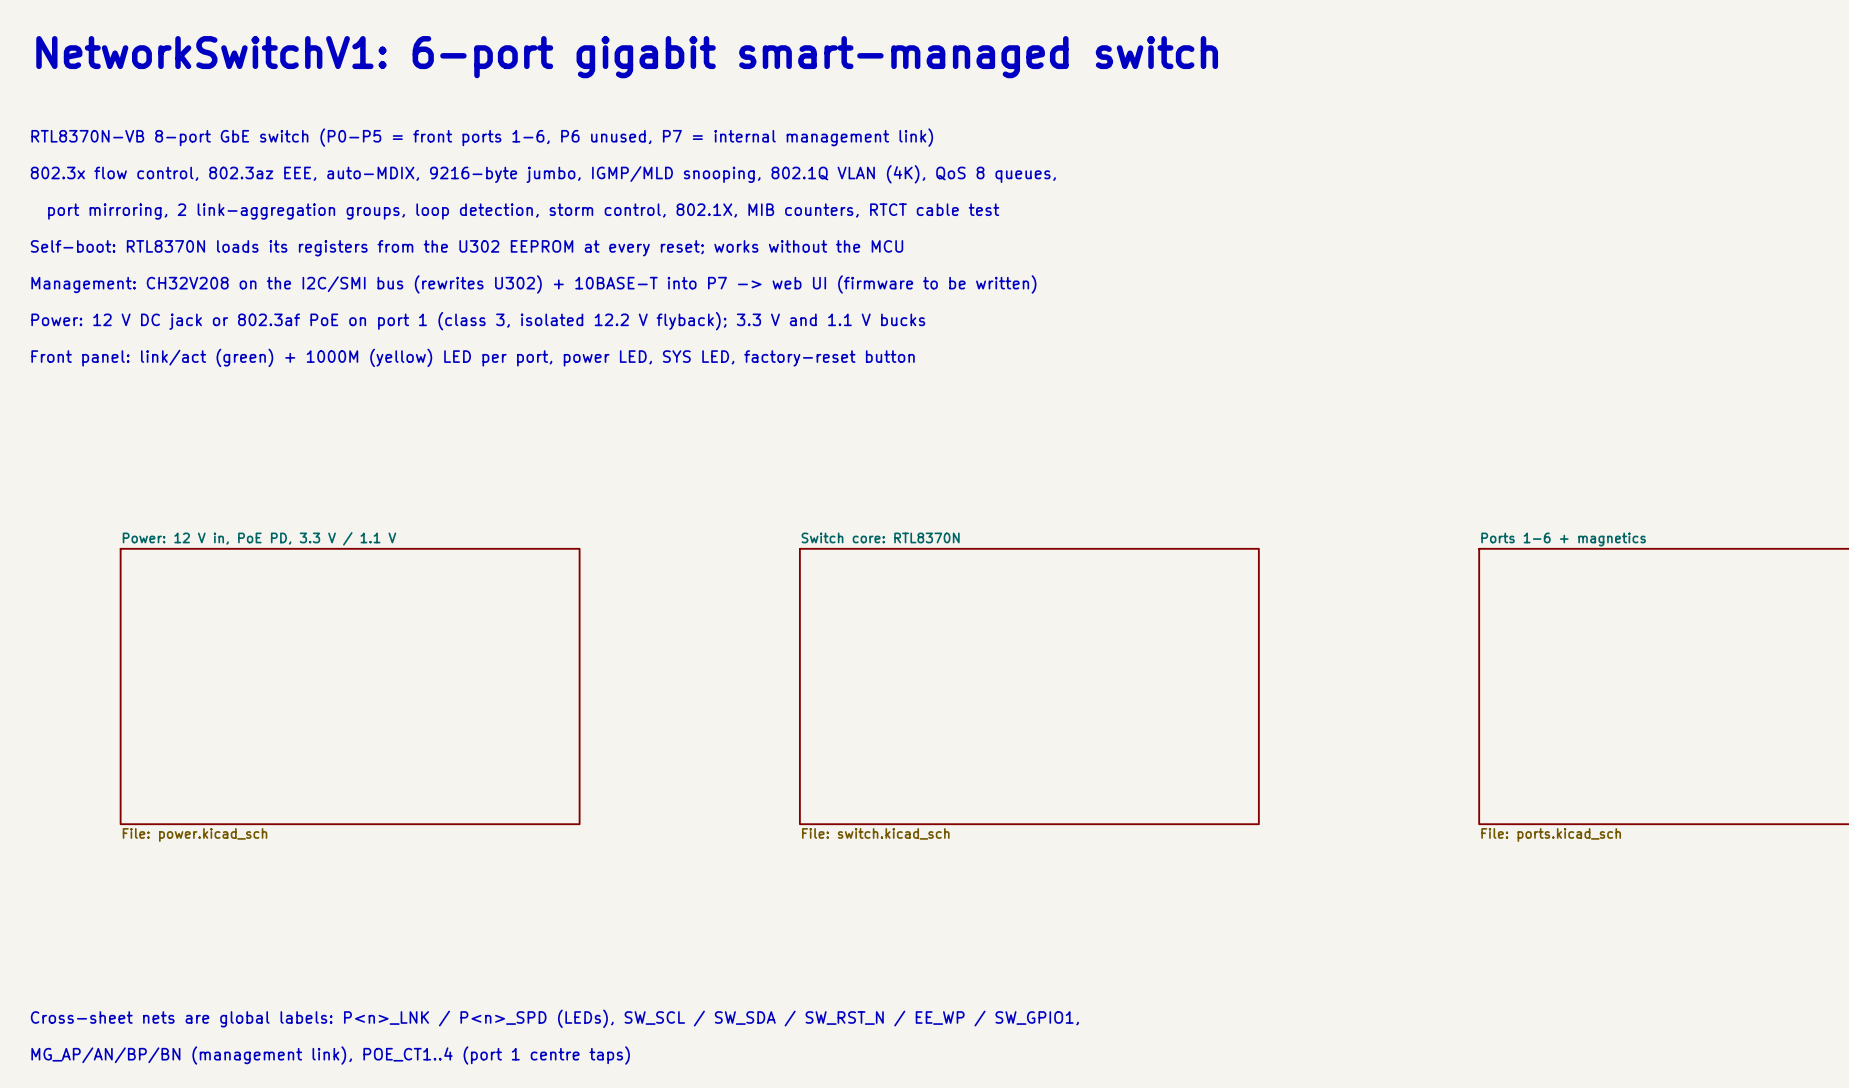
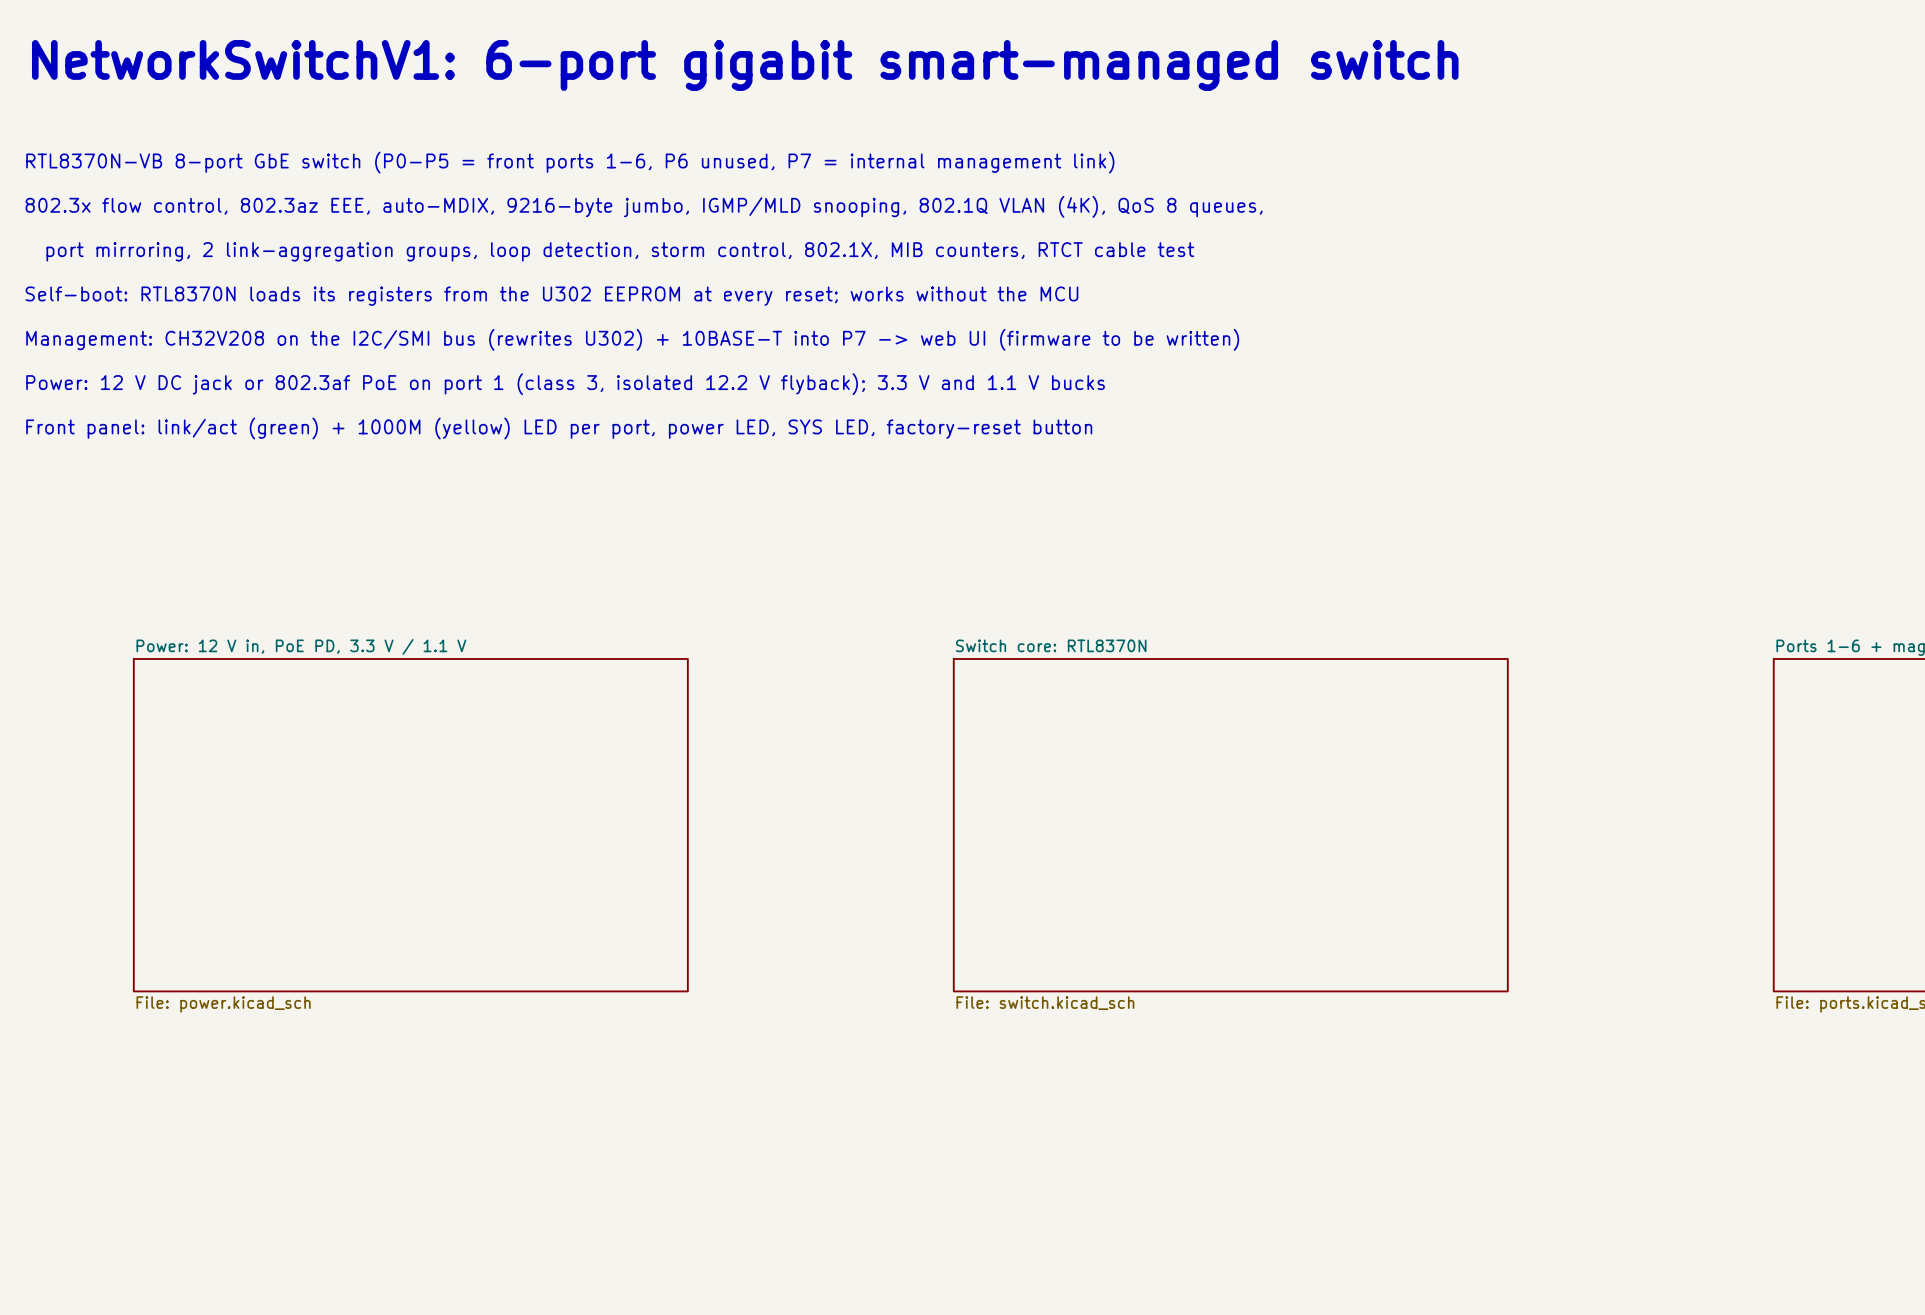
text: Cross-sheet nets are global labels: P<n>_LNK / P<n>_SPD (LEDs), SW_SCL / SW_SDA / SW_RST_N / EE_WP / SW_GPIO1, (554, 1018) -> none
text: MG_AP/AN/BP/BN (management link), POE_CT1..4 (port 1 centre taps) (330, 1055) -> none

